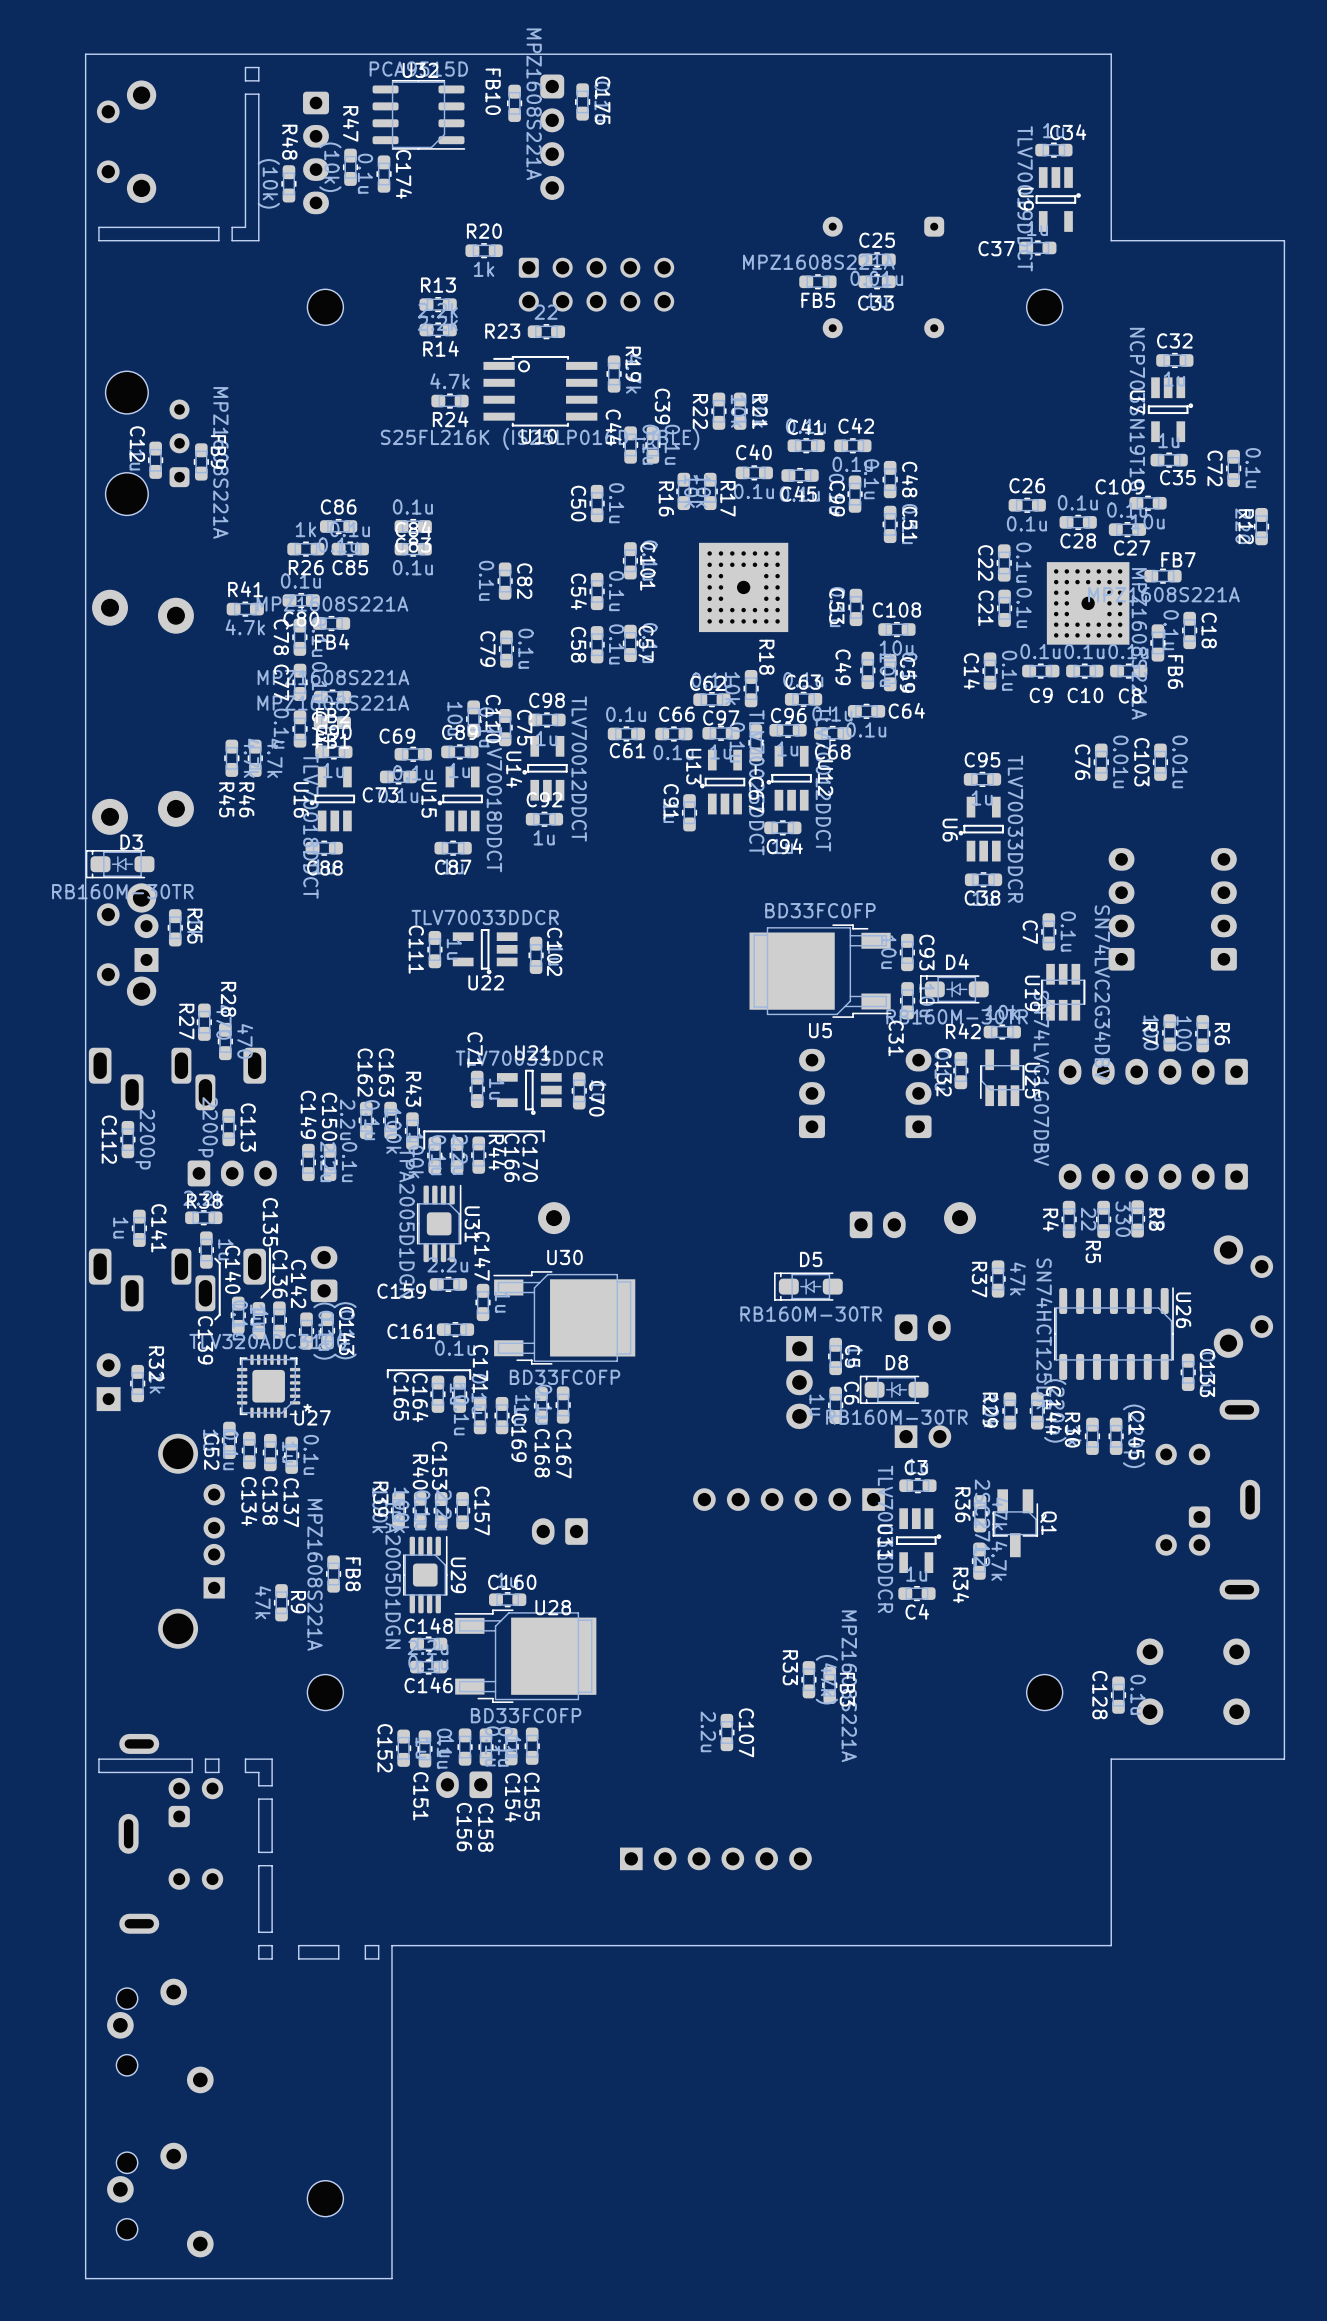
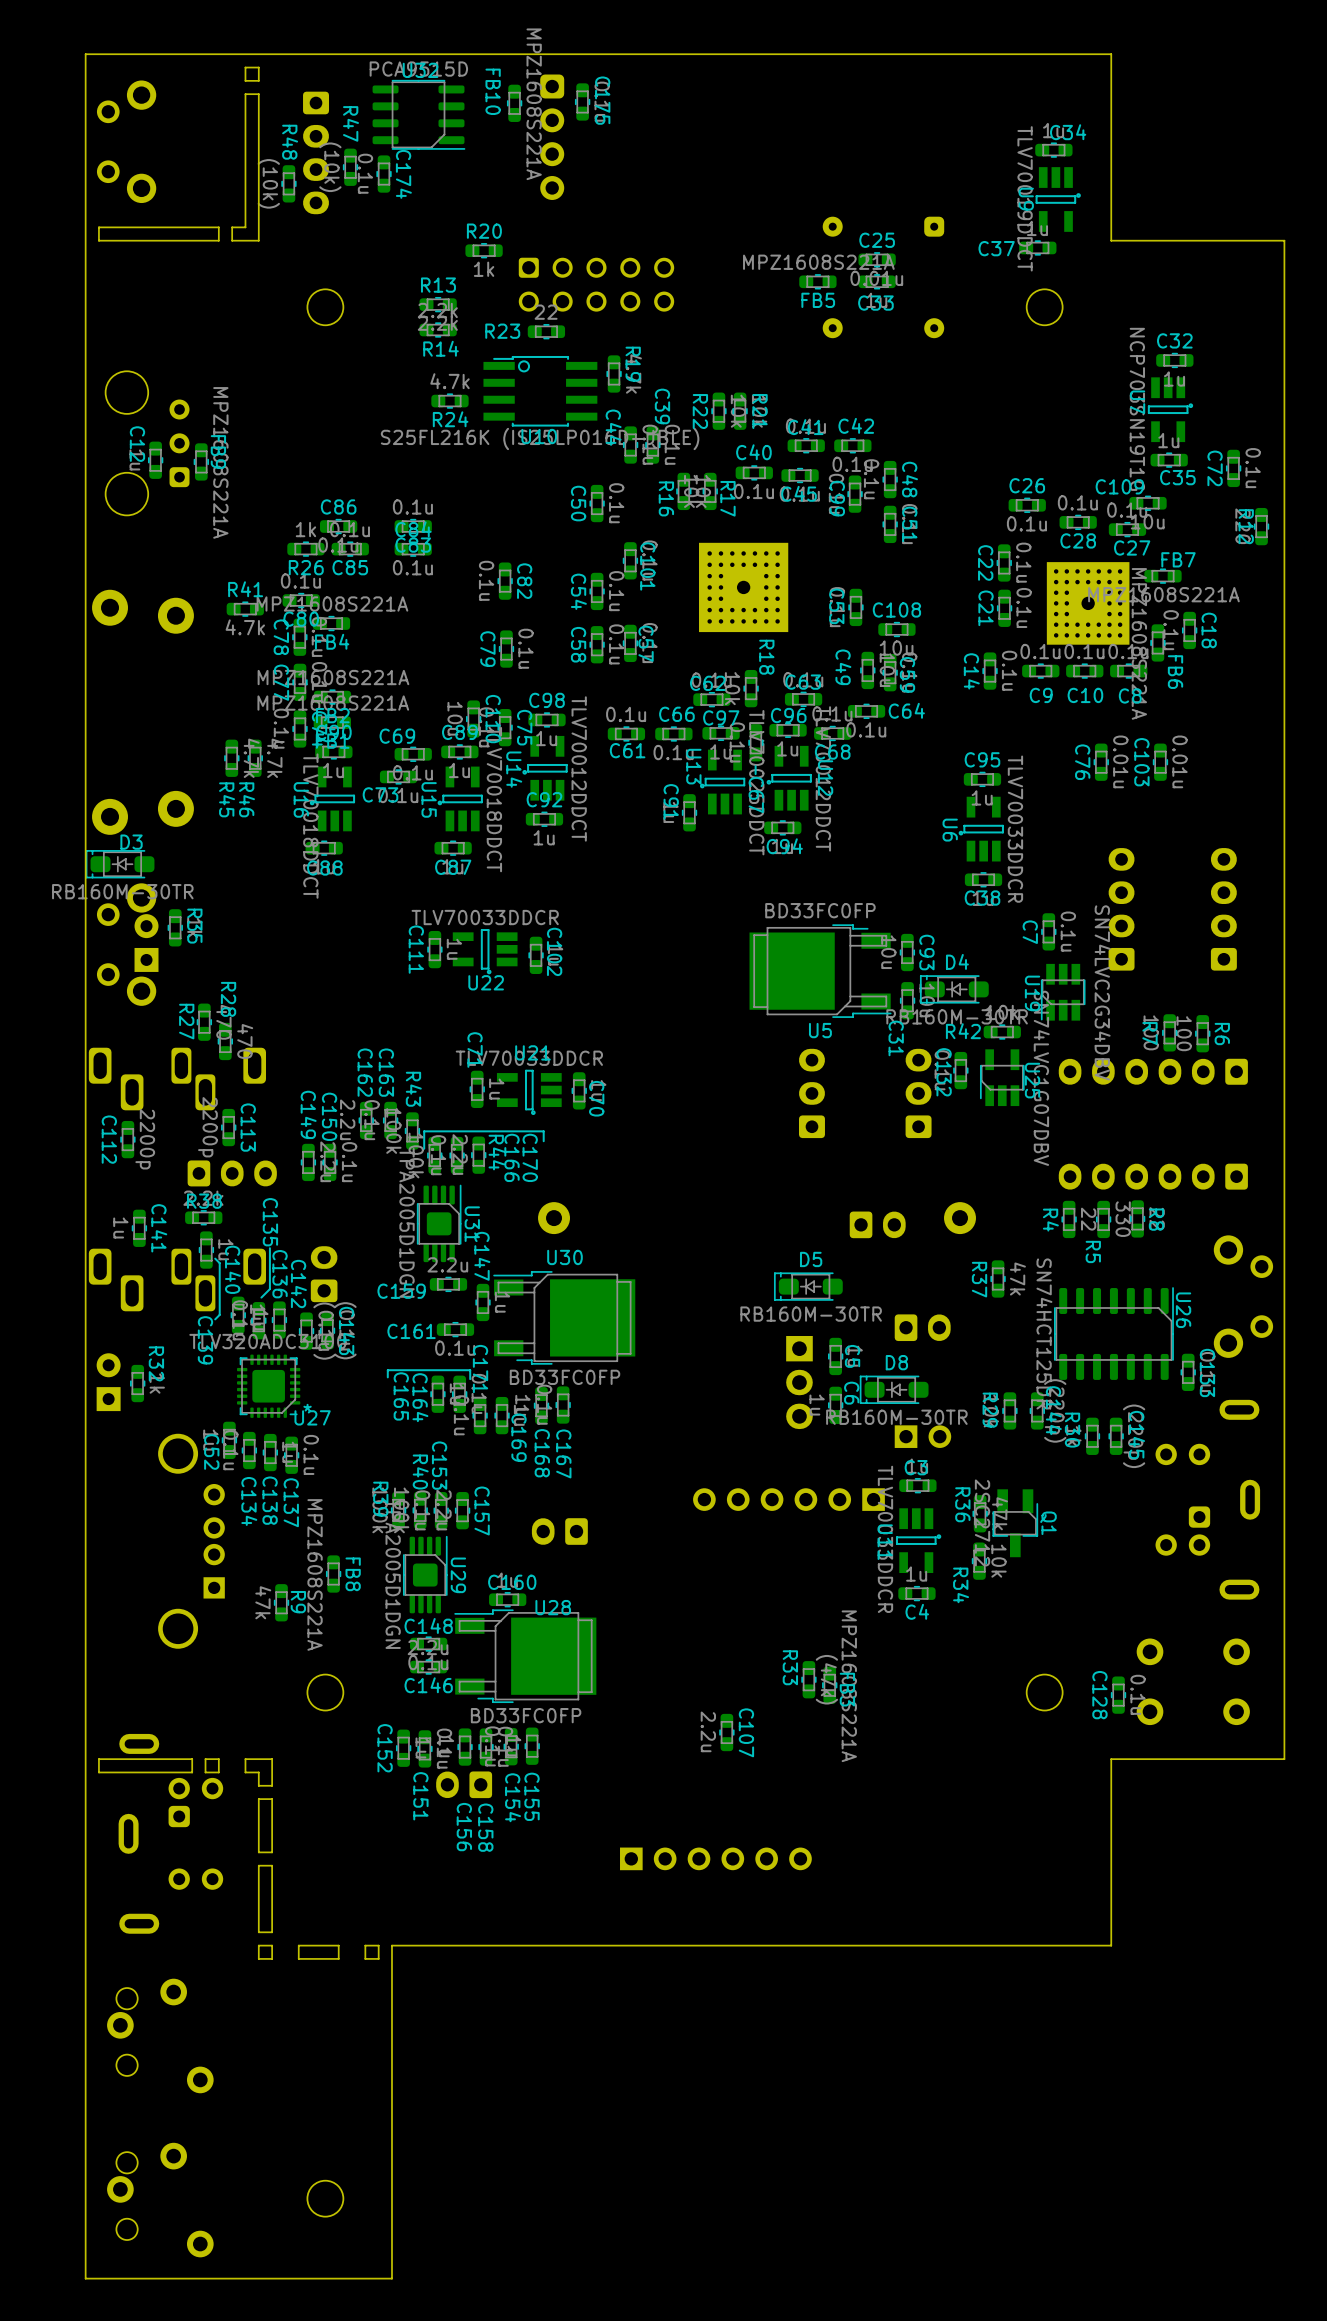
R34 value: 4.7k (999, 1561) -> 10k (999, 1561)

